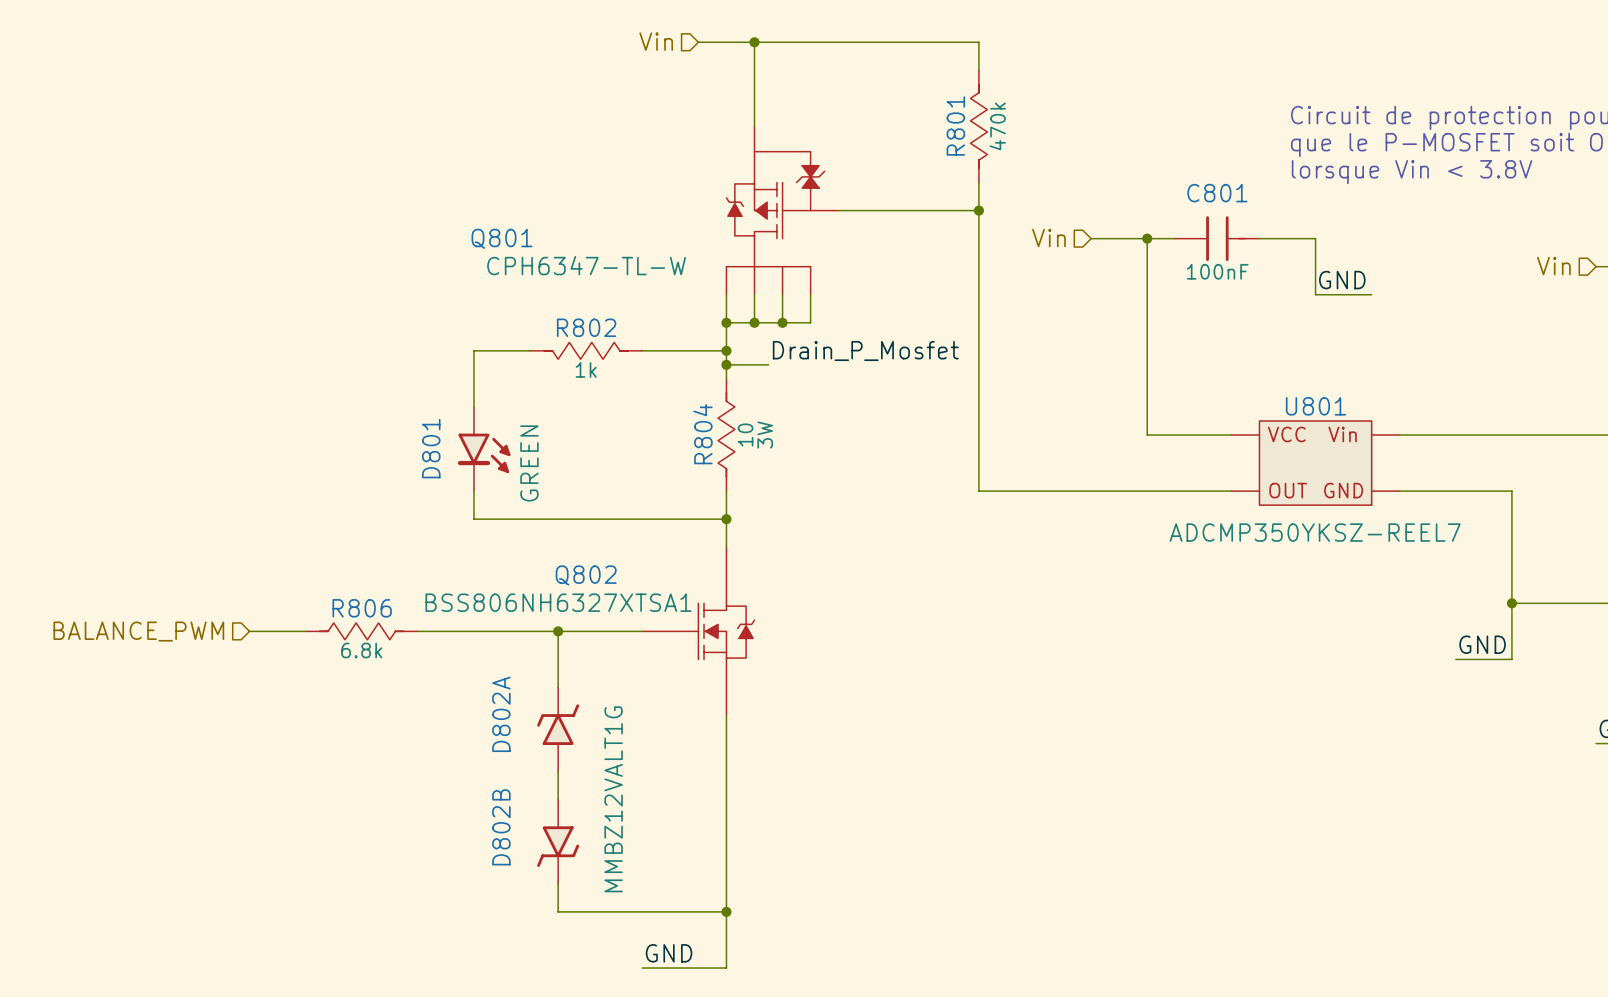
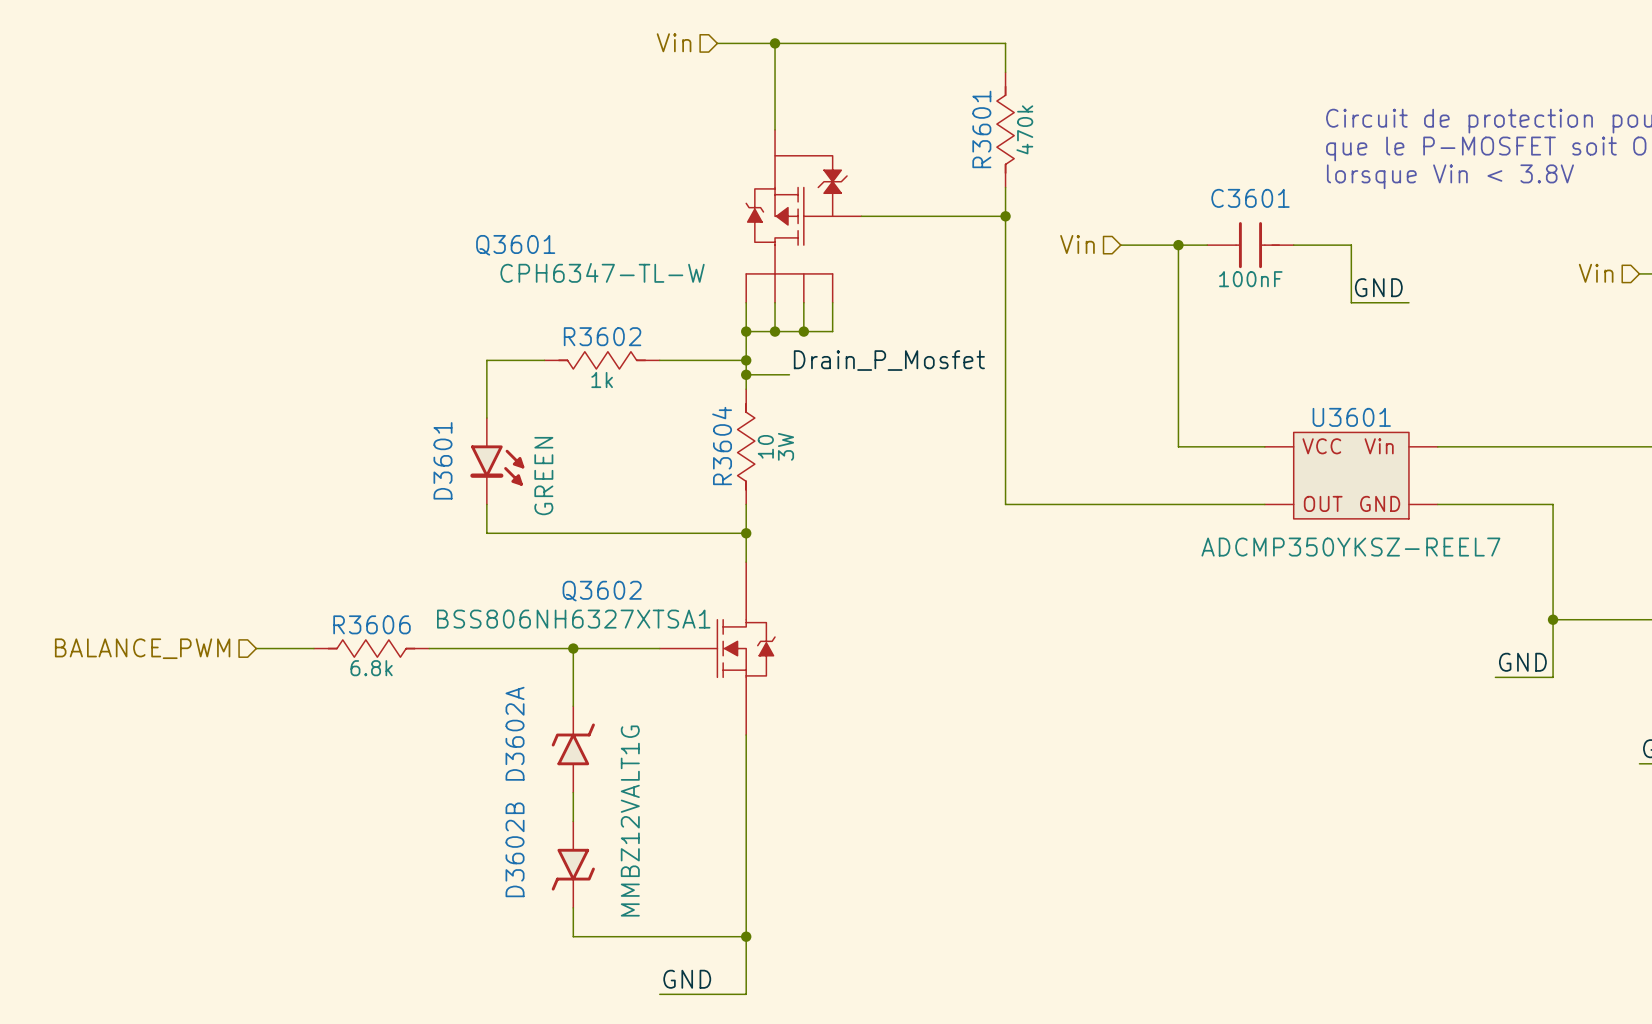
R801 name: R801 (955, 126) -> R3601 (981, 129)
C801 name: C801 (1217, 193) -> C3601 (1250, 198)
Q801 name: Q801 (502, 238) -> Q3601 (515, 245)
R802 name: R802 (586, 327) -> R3602 (602, 336)
U801 name: U801 (1315, 406) -> U3601 (1351, 417)
R804 name: R804 (702, 434) -> R3604 (722, 446)
D801 name: D801 (431, 448) -> D3601 (442, 460)
Q802 name: Q802 (586, 575) -> Q3602 (602, 591)
R806 name: R806 (362, 608) -> R3606 (372, 624)
D802A name: D802A (501, 714) -> D3602A (515, 733)
D802B name: D802B (501, 827) -> D3602B (515, 849)

